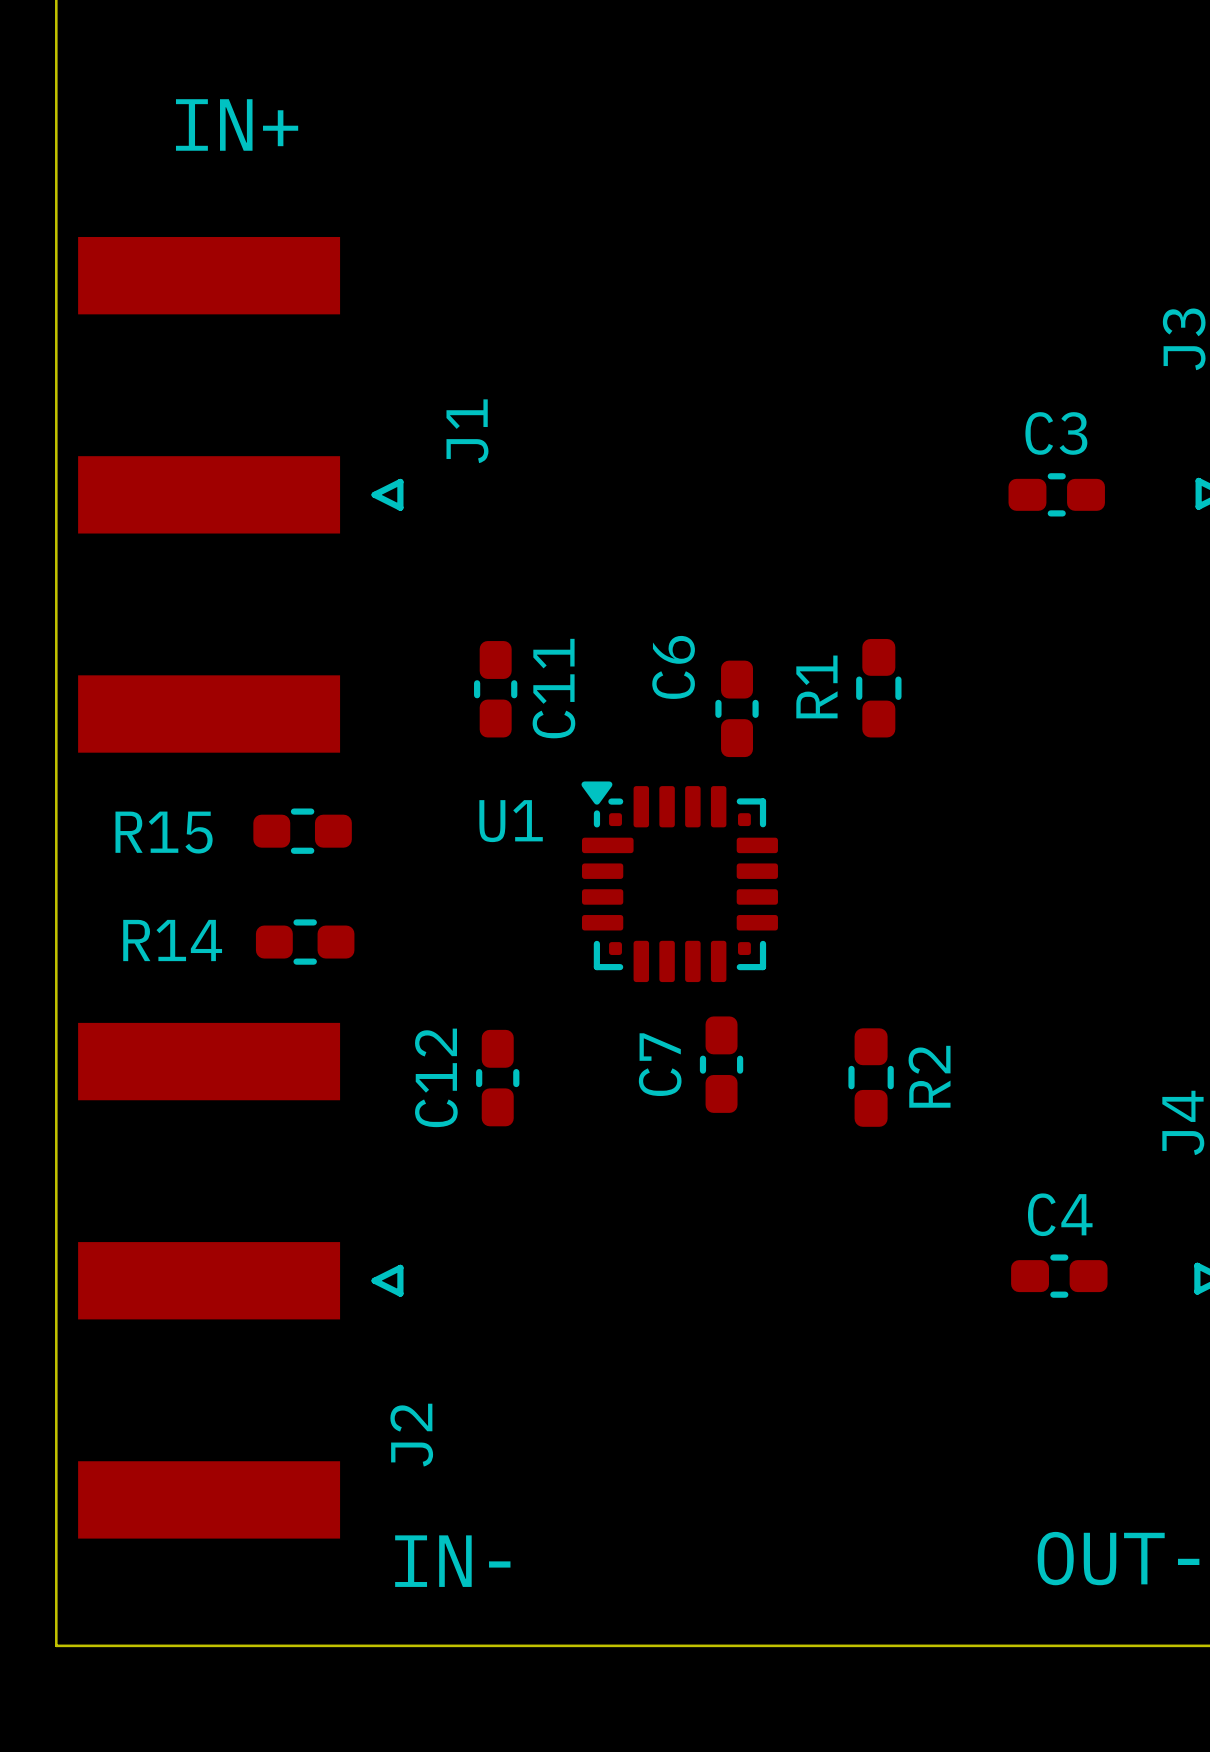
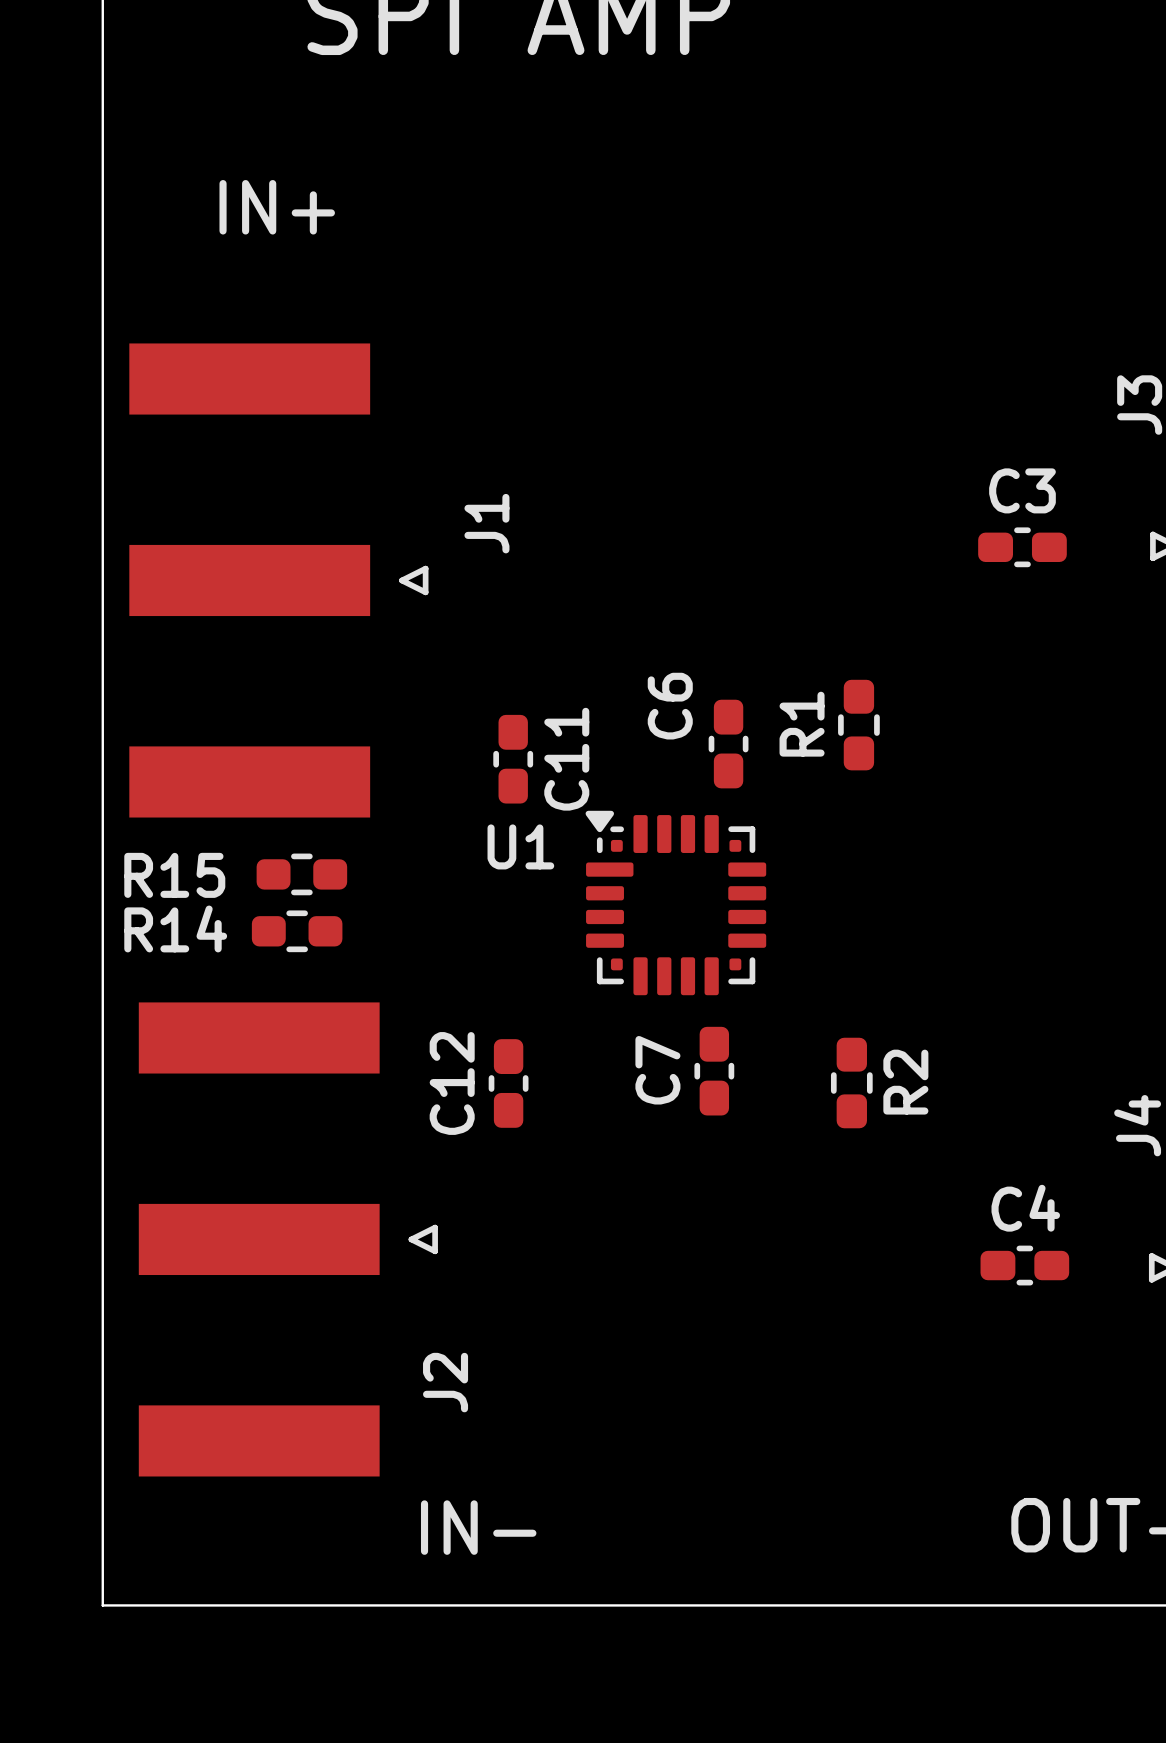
J1 position: (240, 494) -> (278, 580)
C11 position: (495, 689) -> (513, 759)
R15 position: (302, 831) -> (301, 874)
R14 position: (305, 942) -> (297, 931)
J2 position: (240, 1280) -> (288, 1239)

